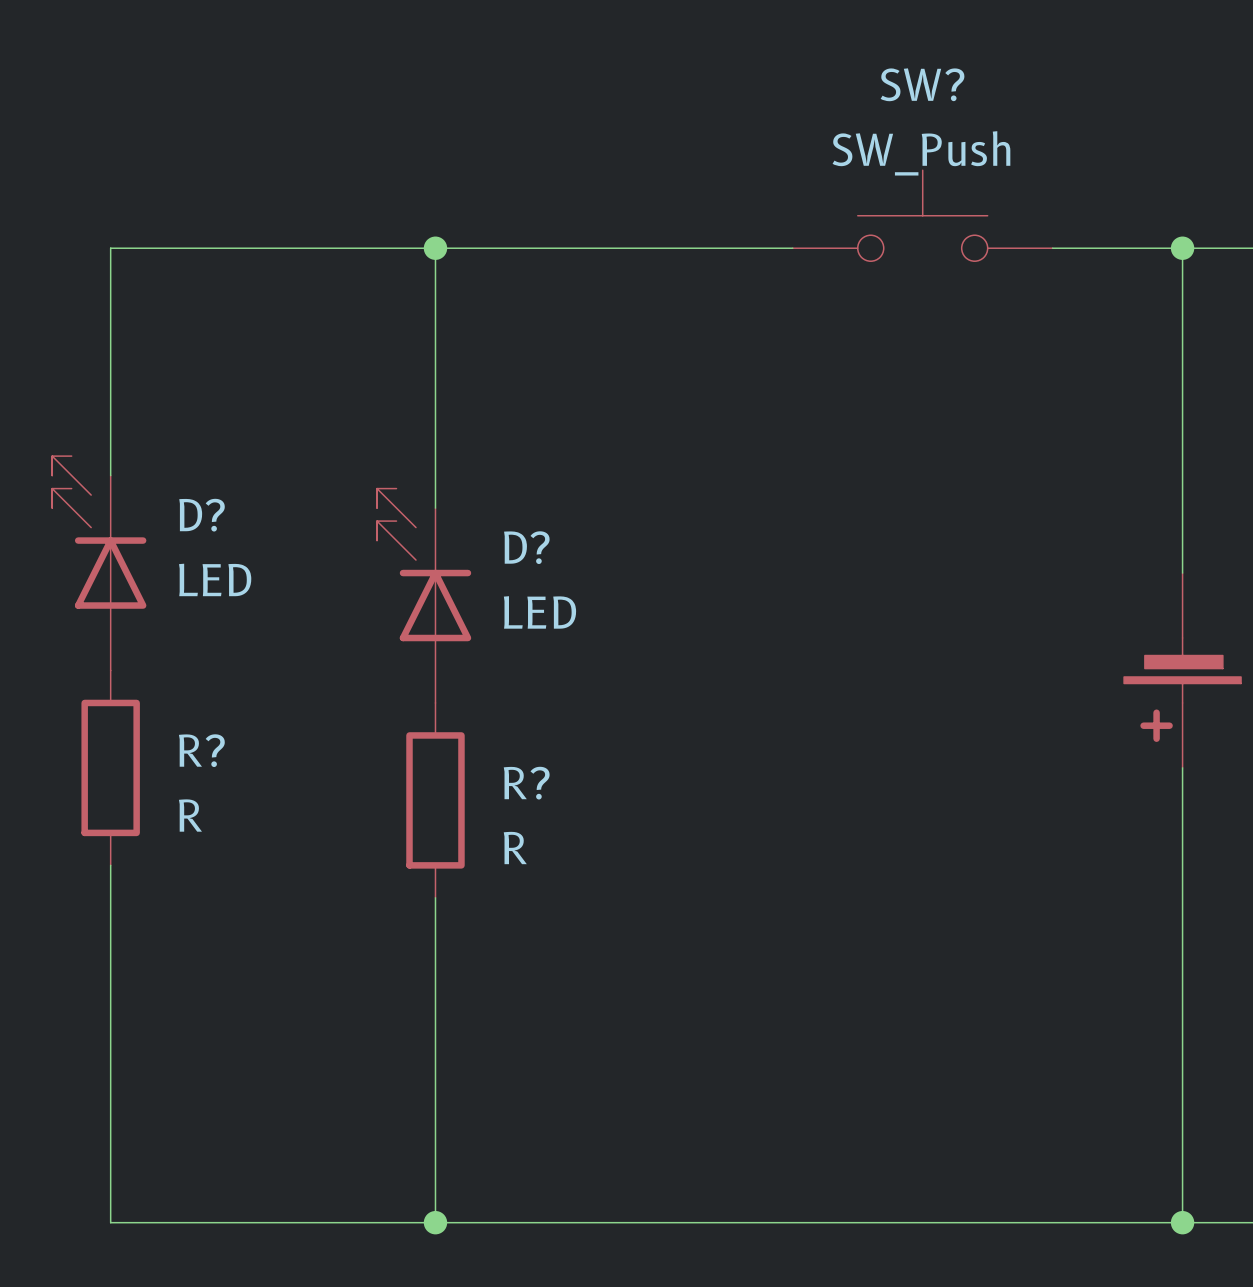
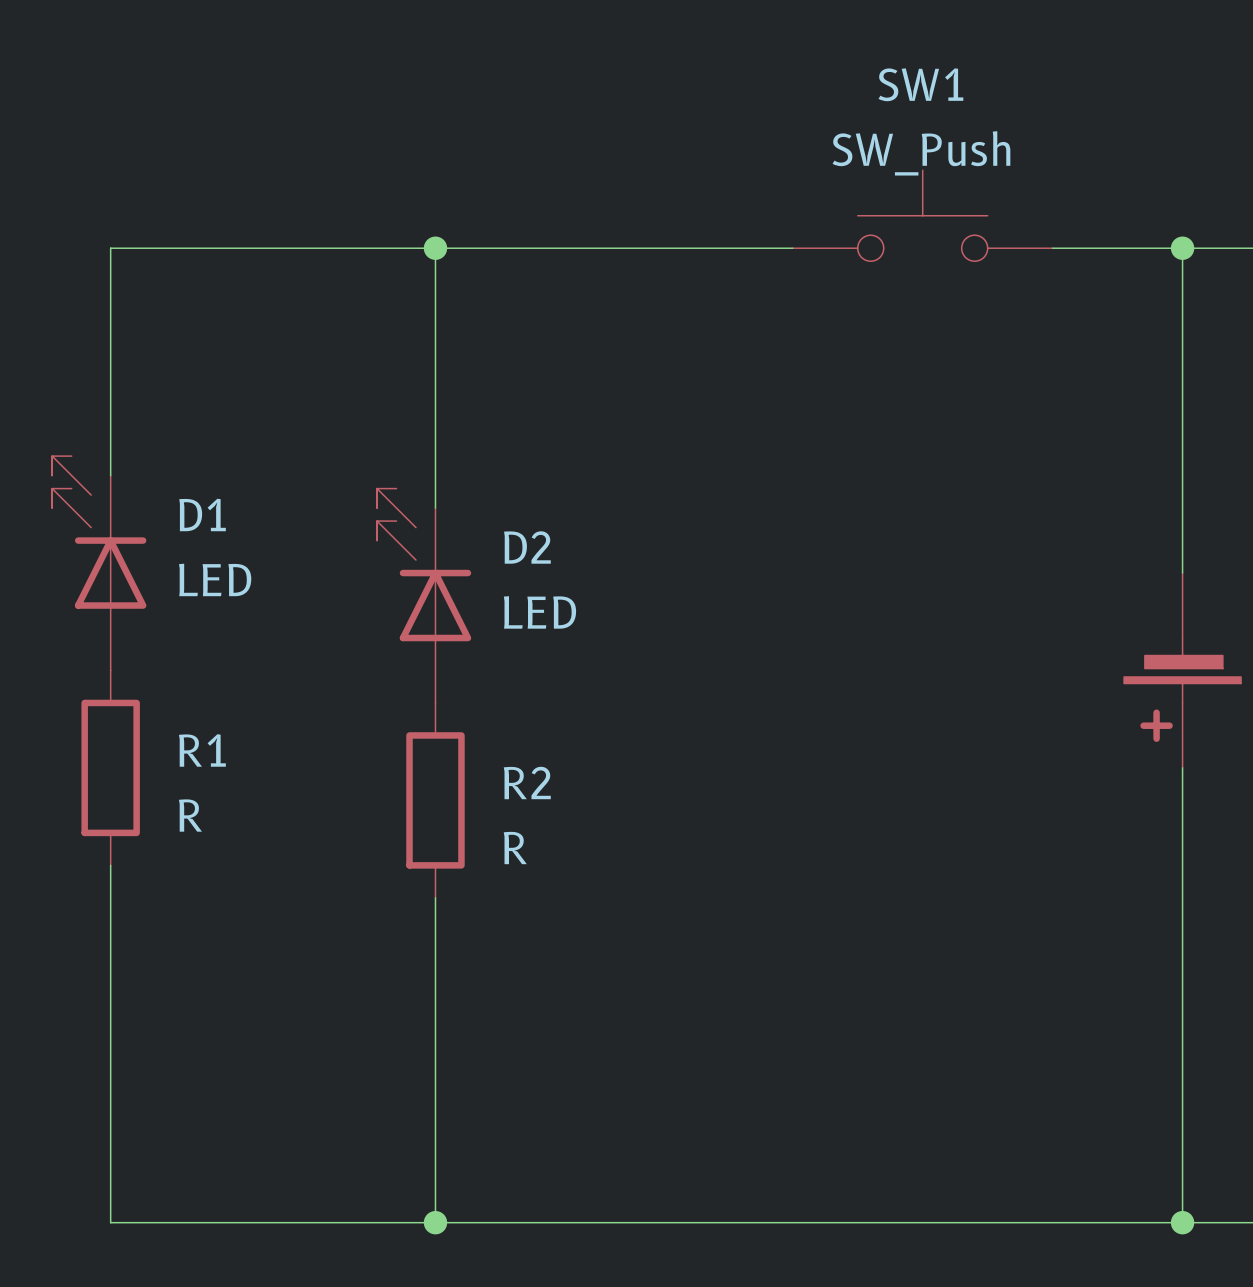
SW? name: SW? (922, 84) -> SW1 (920, 84)
D? name: D? (202, 515) -> D1 (202, 514)
D? name: D? (526, 547) -> D2 (527, 547)
R? name: R? (201, 750) -> R1 (202, 750)
R? name: R? (526, 783) -> R2 (527, 782)

